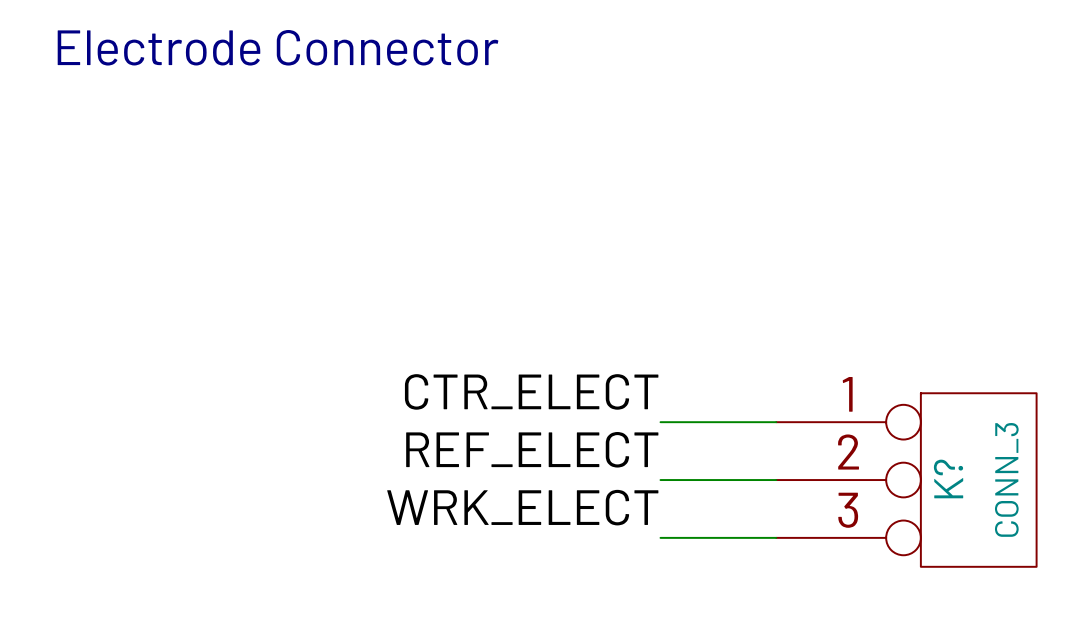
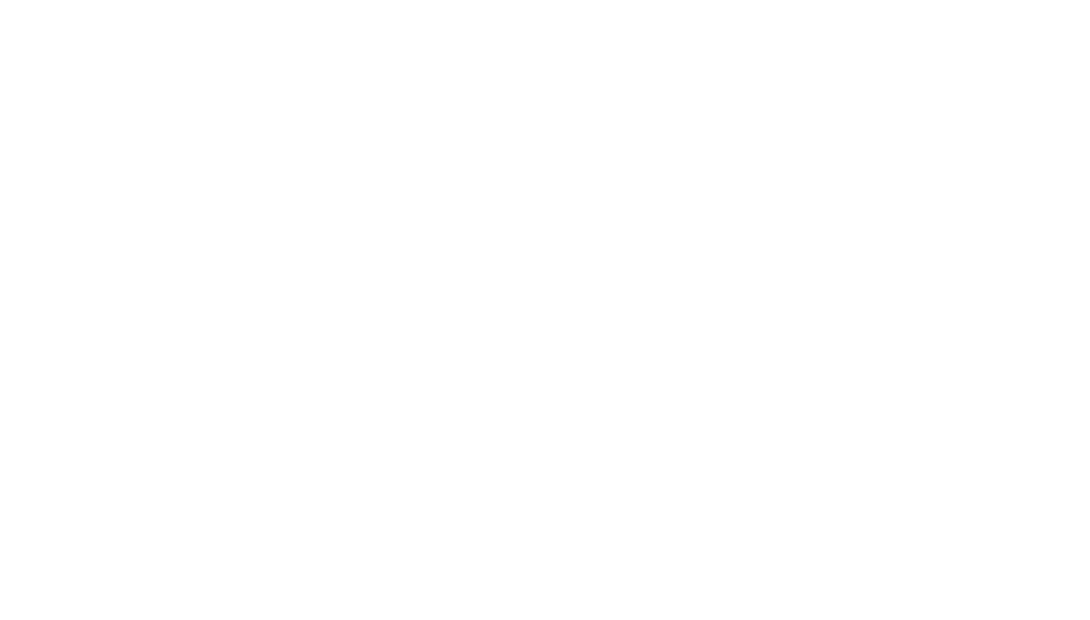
text: Electrode Connector (278, 47) -> none
label: CTR_ELECT (531, 391) -> none
wire: (660, 422) (776, 422) -> none
label: REF_ELECT (532, 449) -> none
wire: (660, 480) (776, 480) -> none
K?: CONN_3 (906, 480) -> none
label: WRK_ELECT (522, 507) -> none
wire: (660, 537) (776, 537) -> none

